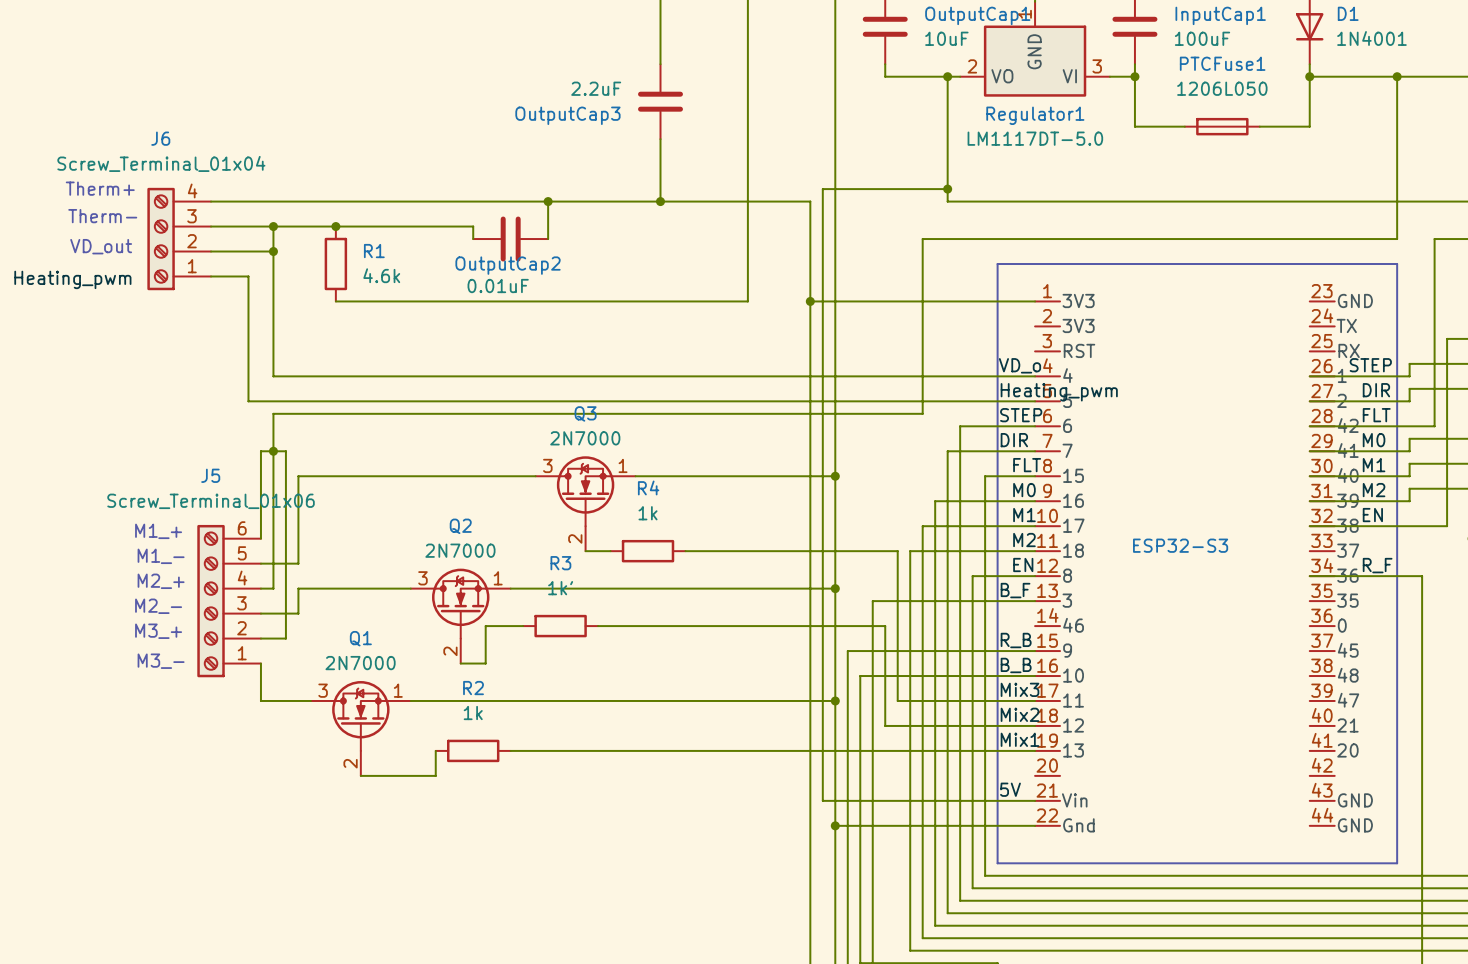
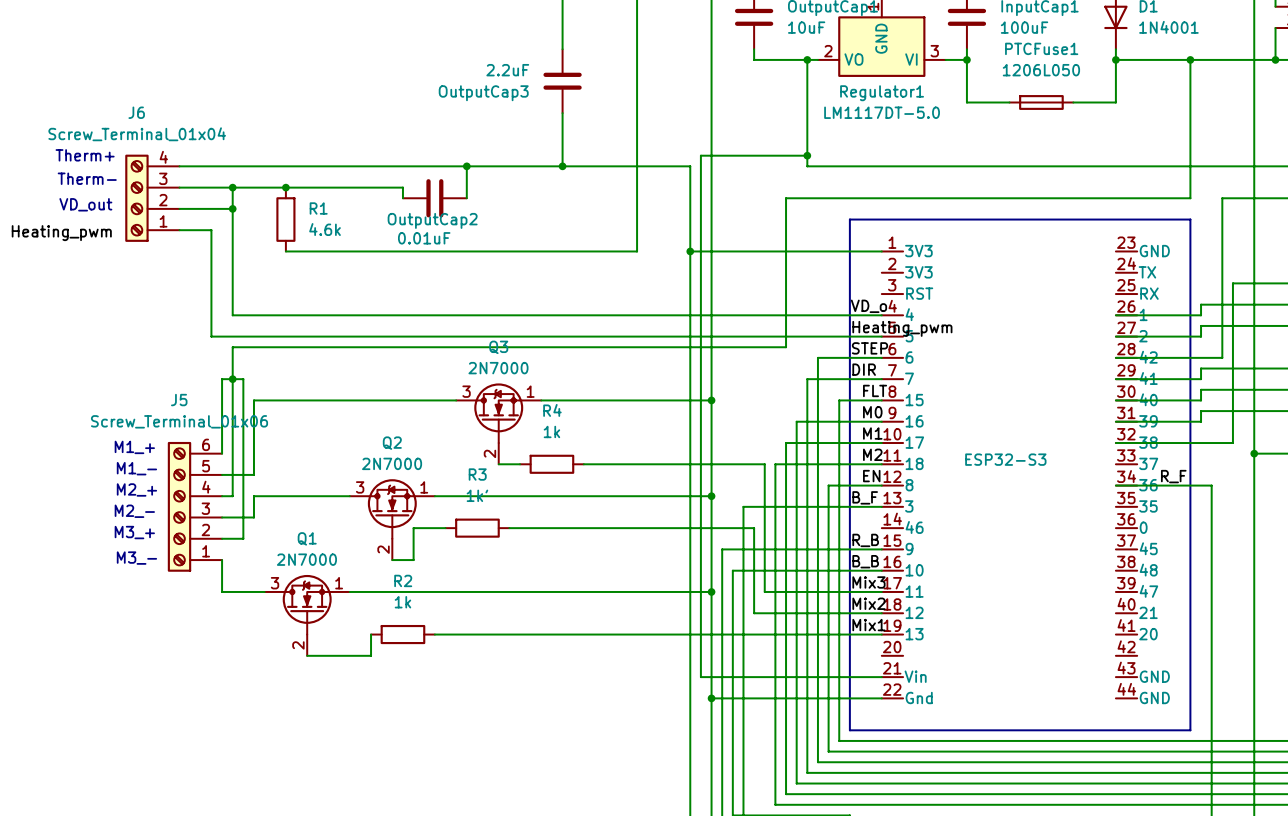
label: STEP (1370, 365) -> none
label: DIR (1376, 390) -> none
label: FLT (1376, 415) -> none
label: M0 (1374, 440) -> none
label: M1 (1374, 465) -> none
label: M2 (1374, 490) -> none
label: EN (1372, 515) -> none
label: 5V (1010, 789) -> none

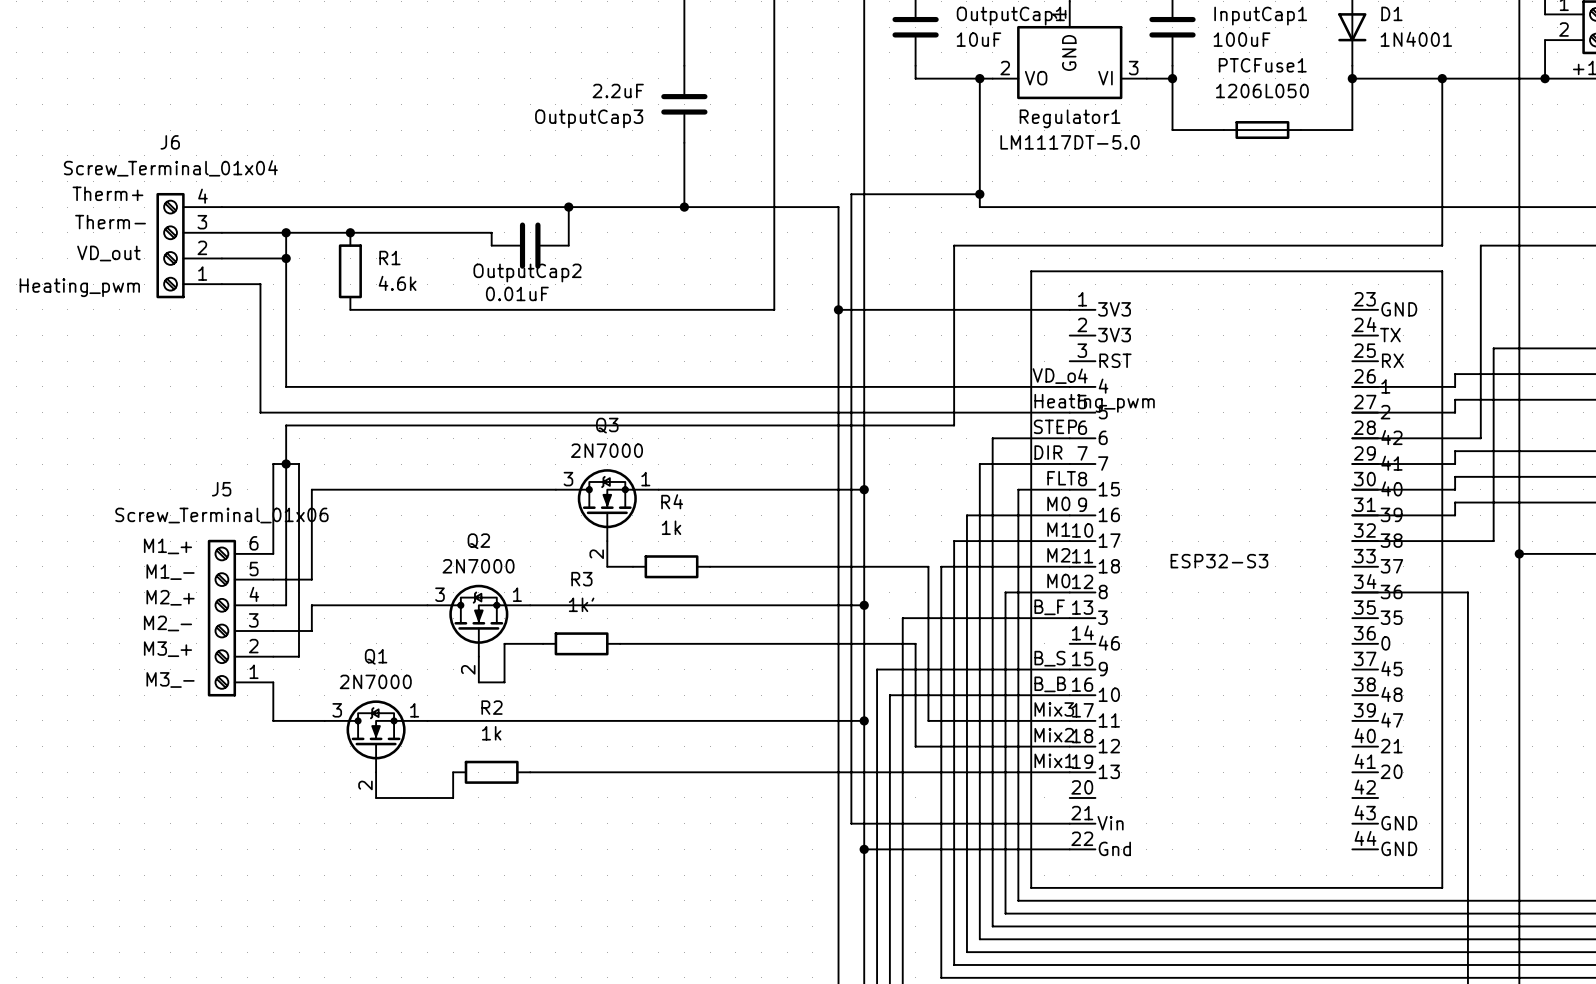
label: EN (871, 476) -> M0 (1058, 581)
label: R_F (1173, 476) -> none
label: R_B (865, 540) -> B_S (1049, 658)

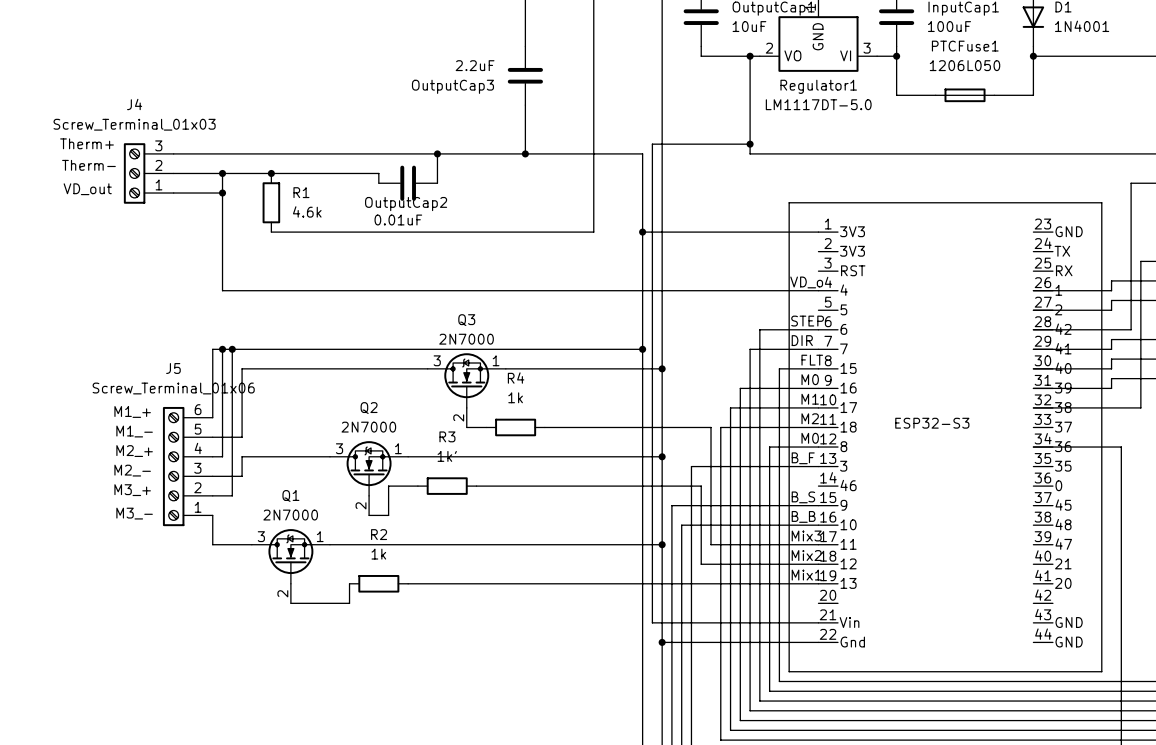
wire: (1442, 78) (1442, 245) (954, 245) (954, 425) (286, 425) (286, 464) -> none
junction: (1442, 78) -> none
J4: none -> Screw_Terminal_01x03 (148, 173)
J6: Screw_Terminal_01x04 (189, 245) -> none
wire: (221, 284) (260, 284) (260, 412) (1069, 412) -> none
label: Heating_pwm (79, 287) -> none
label: Heating_pwm (1094, 403) -> none
wire: none -> (232, 349) (642, 349)
junction: none -> (232, 349)
junction: none -> (642, 349)

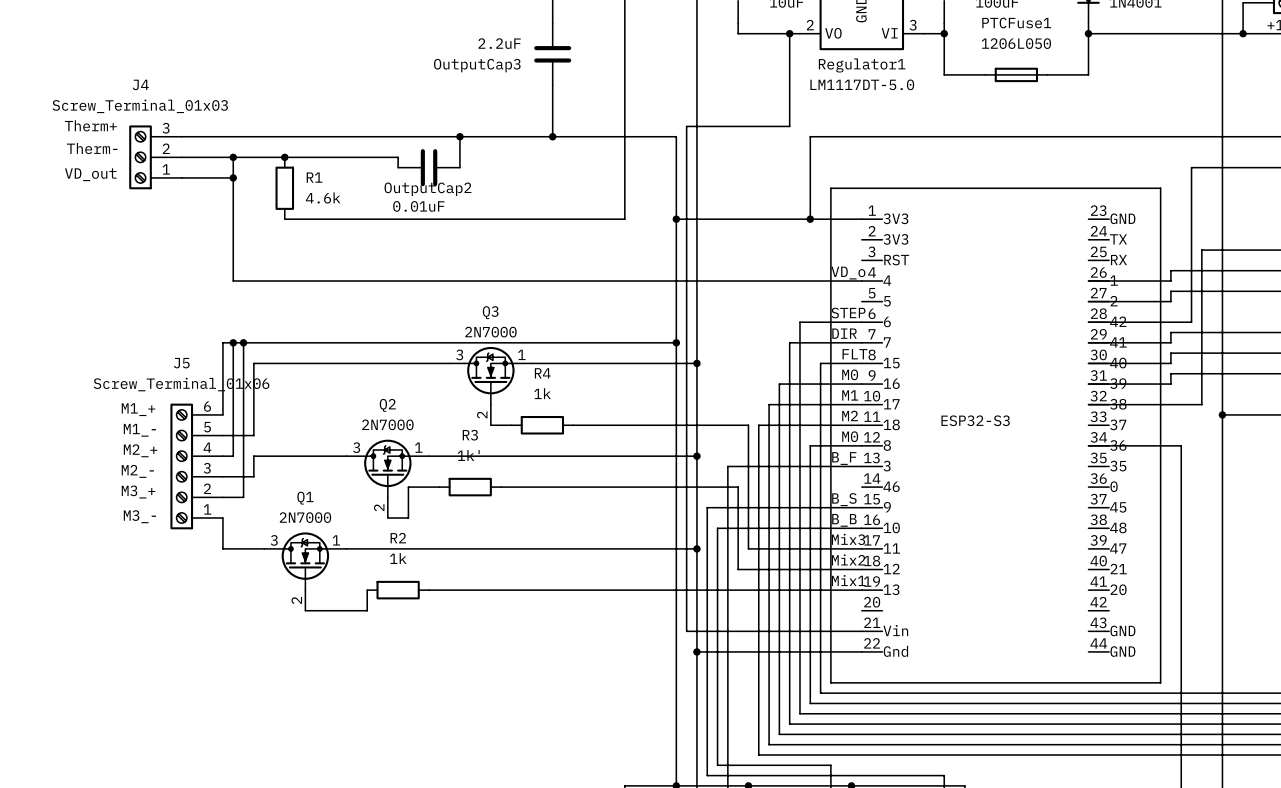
wire: (750, 144) (750, 153) (769, 153) -> (810, 219) (810, 136)
junction: (750, 144) -> none
junction: none -> (810, 219)

